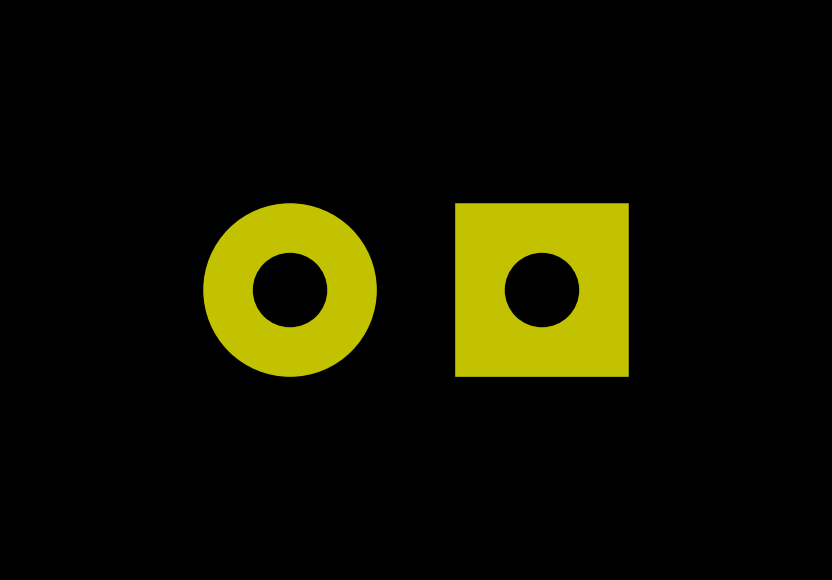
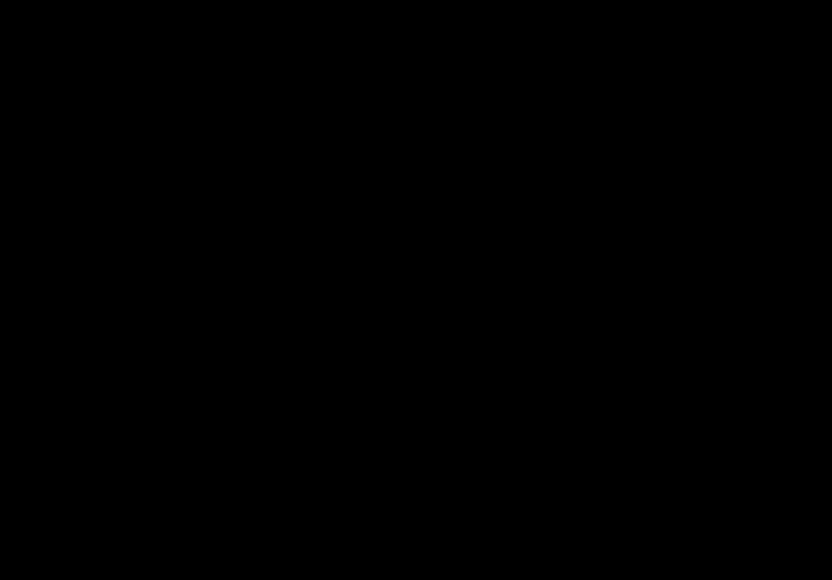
part: (416, 290) -> none

